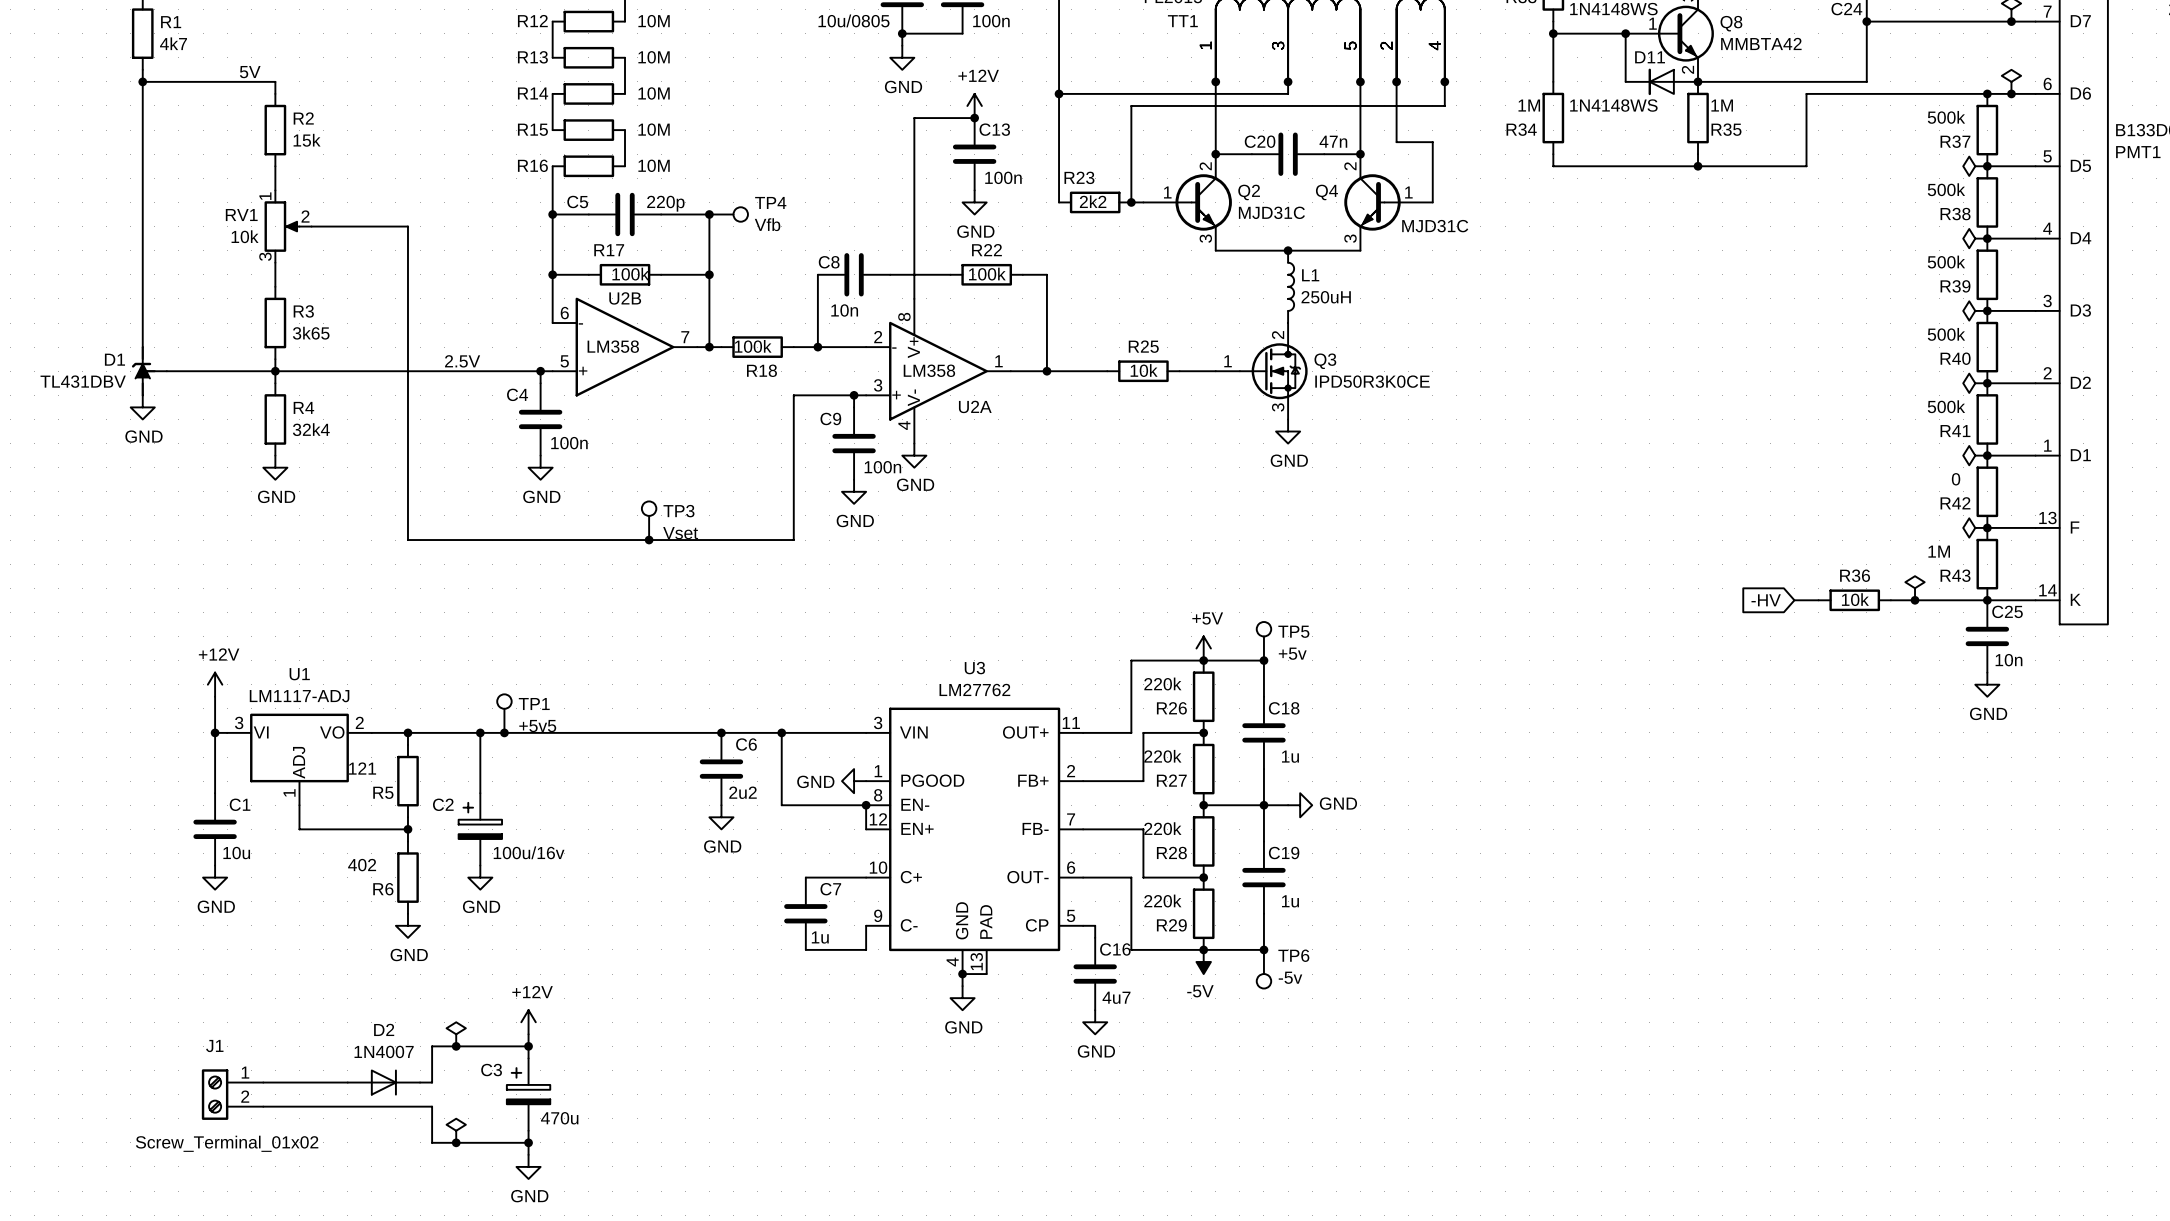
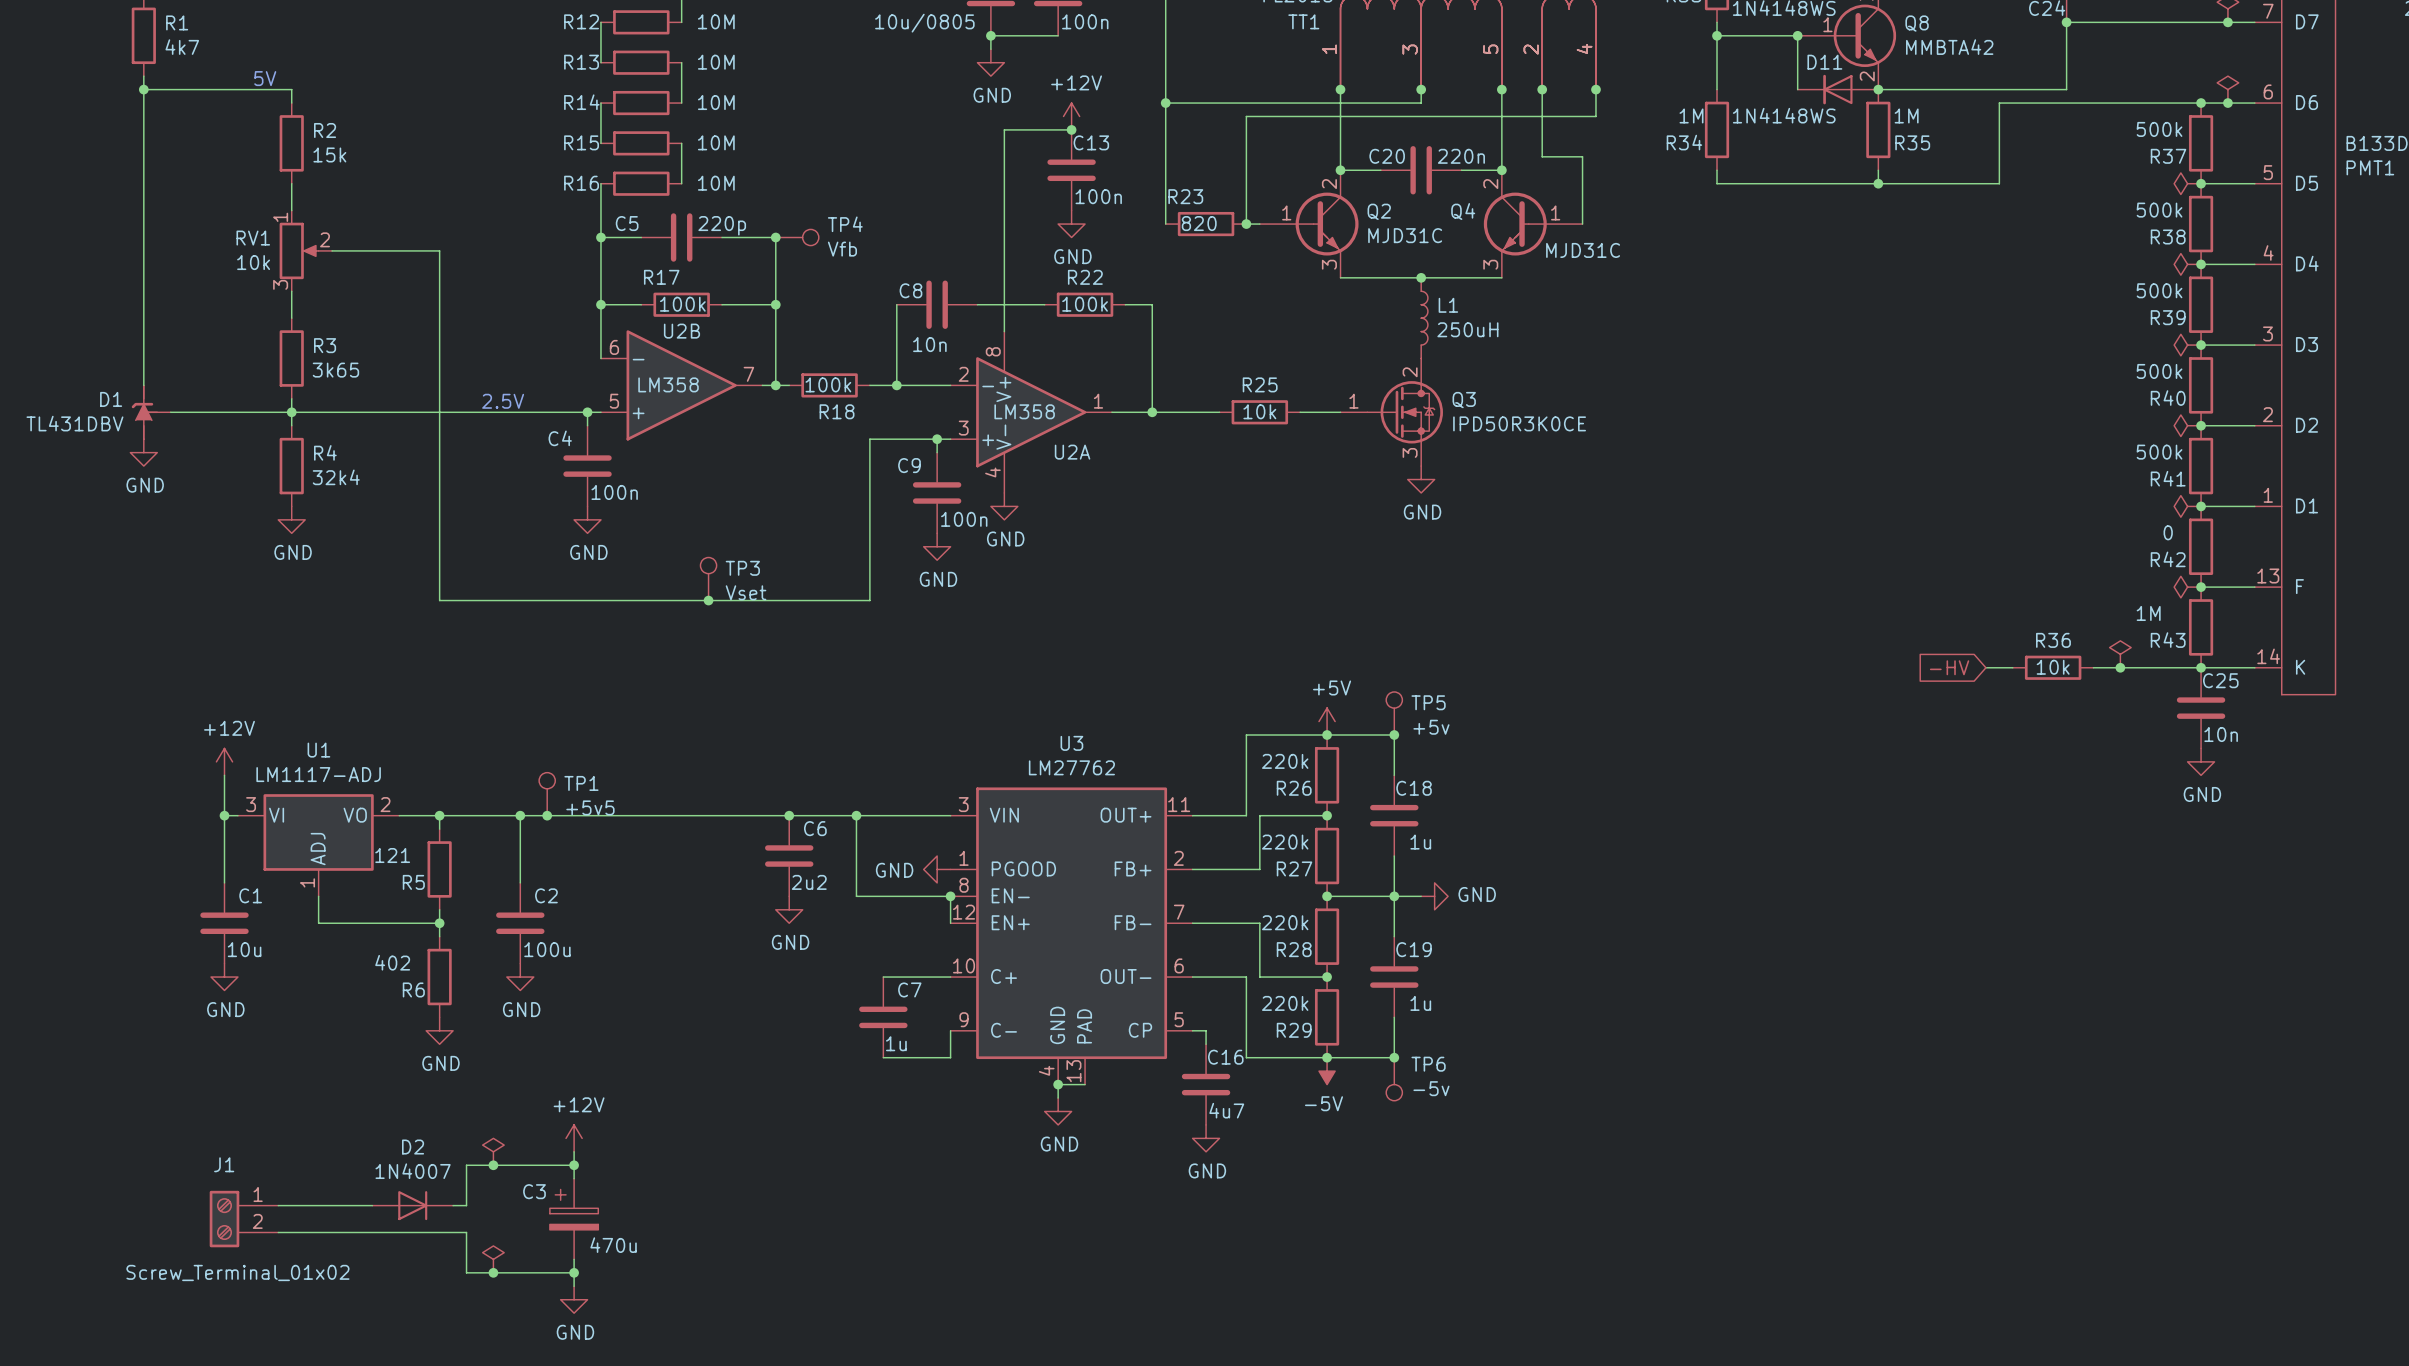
C20 value: 47n (1333, 141) -> 220n (1461, 156)
R23 value: 2k2 (1093, 201) -> 820 (1199, 223)
C2 symbol: [458, 793, 503, 866] -> [496, 882, 545, 964]
C2 name position: C2 (443, 804) -> C2 (546, 895)
C2 value: 100u/16v (529, 852) -> 100u (547, 949)

